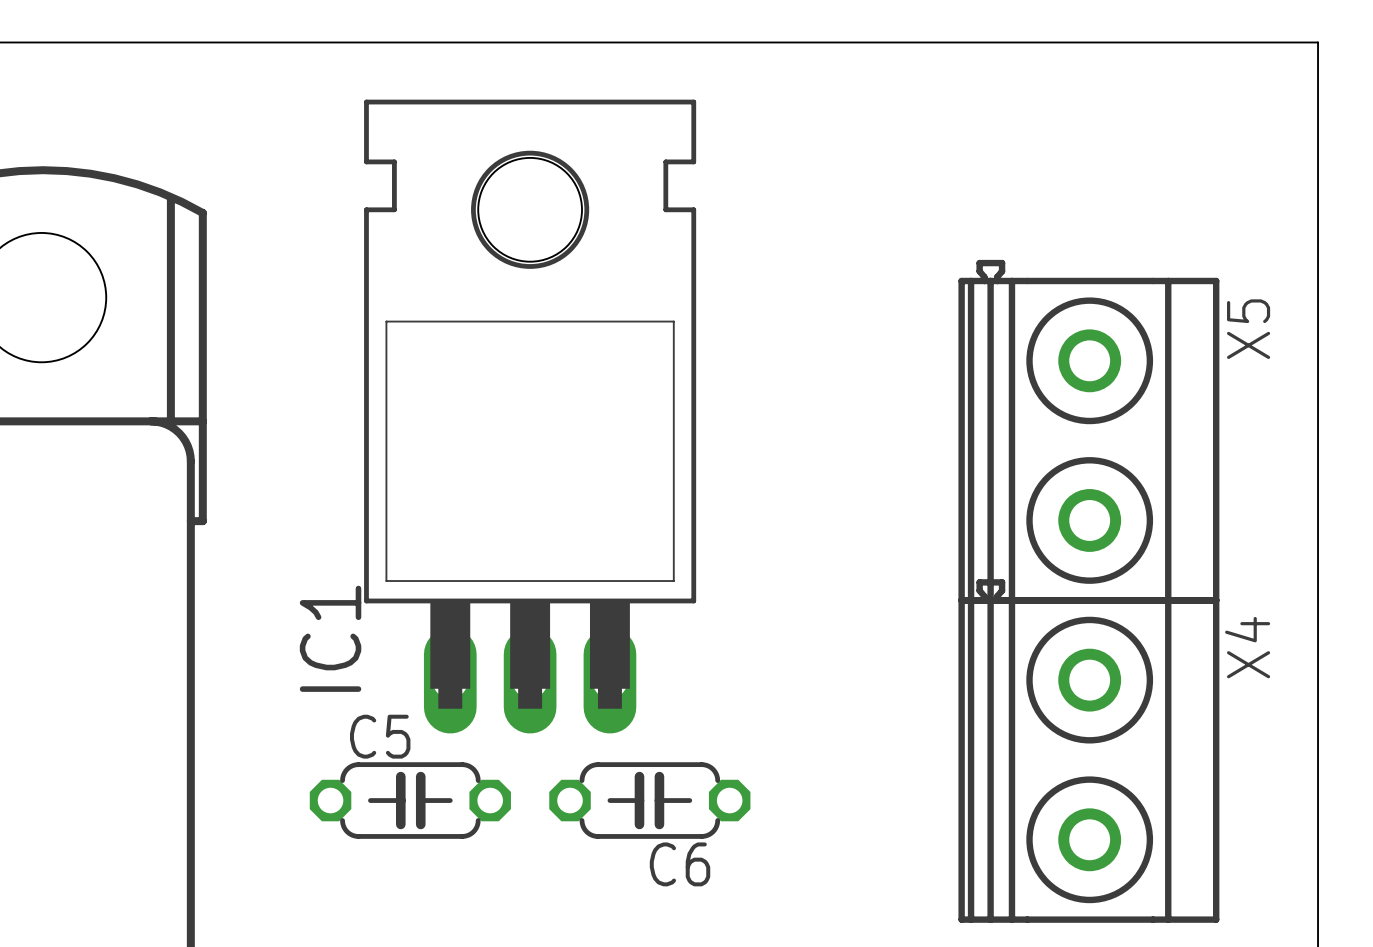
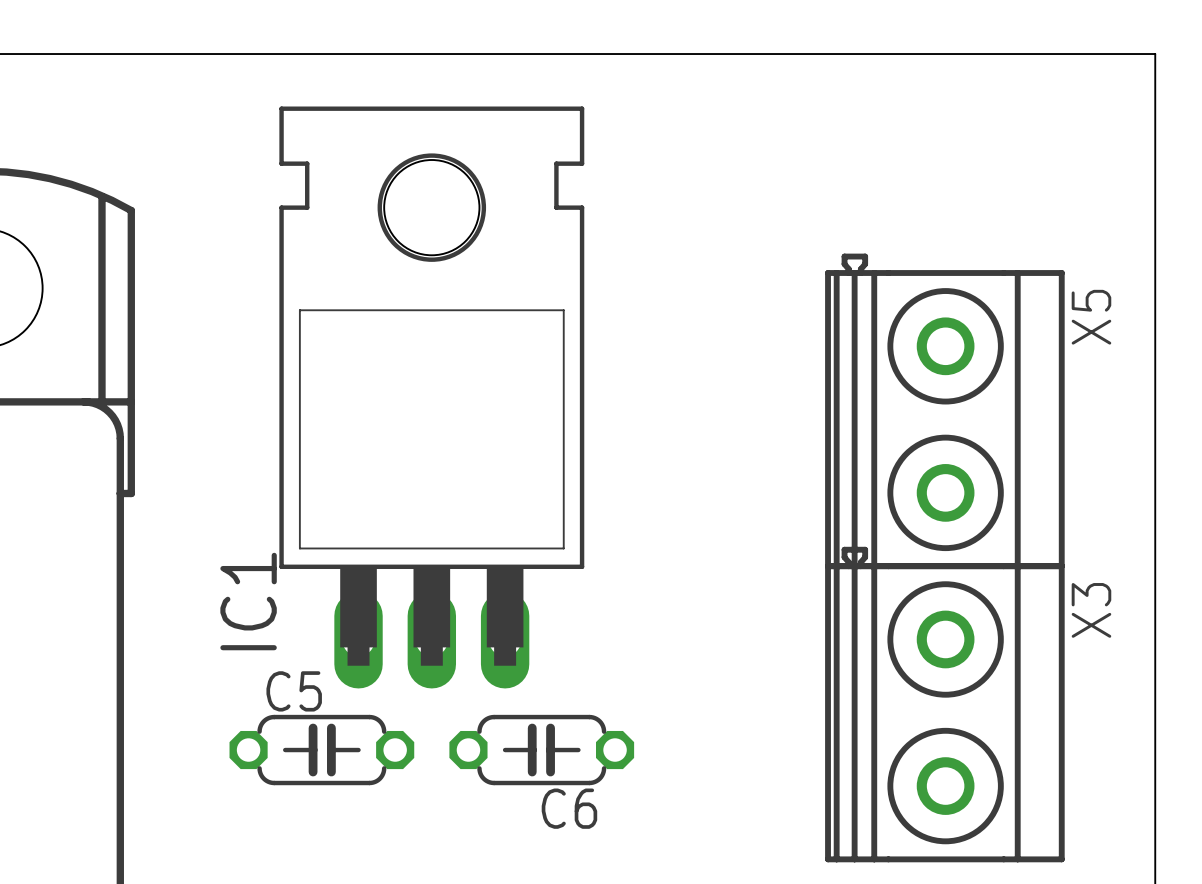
X4 name: X4 (1247, 647) -> X3 (1091, 610)

